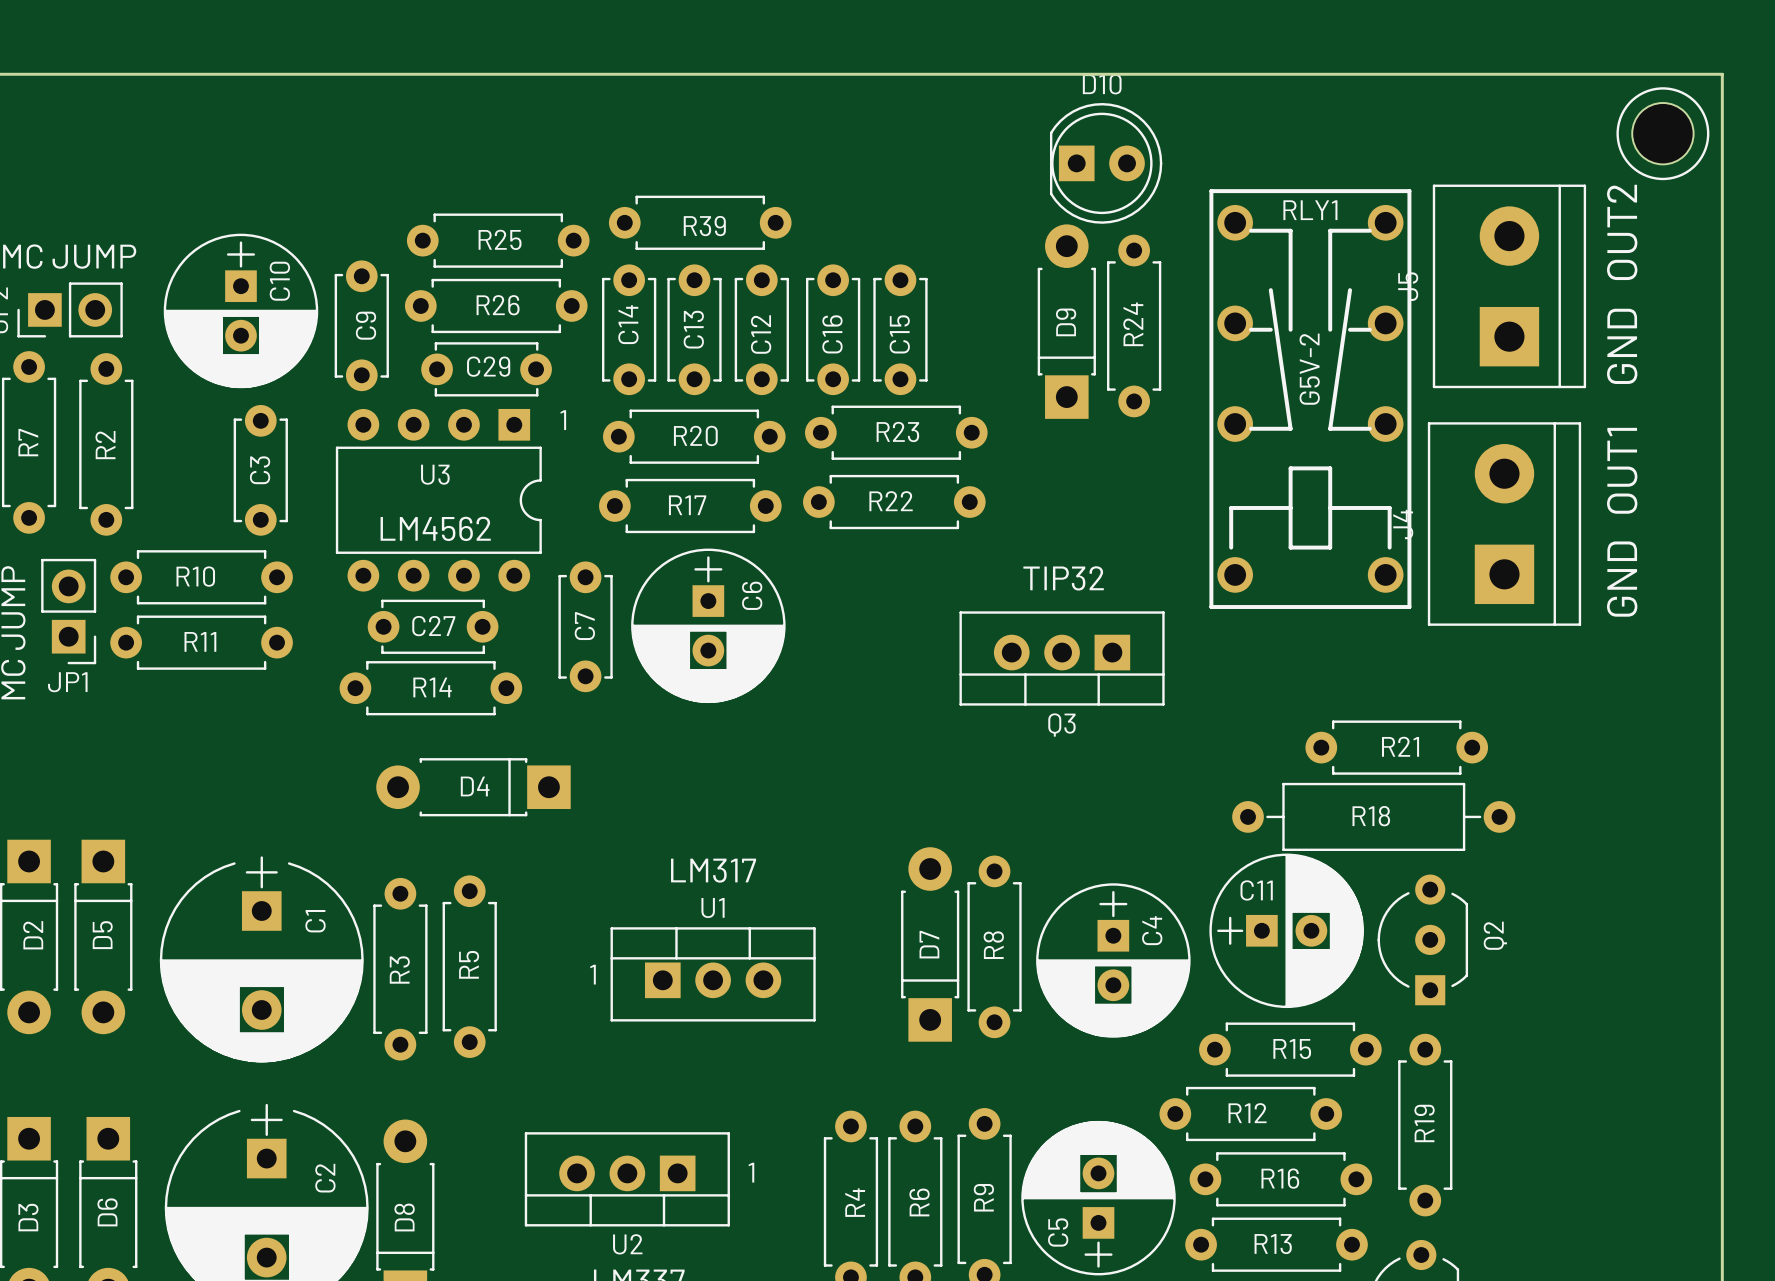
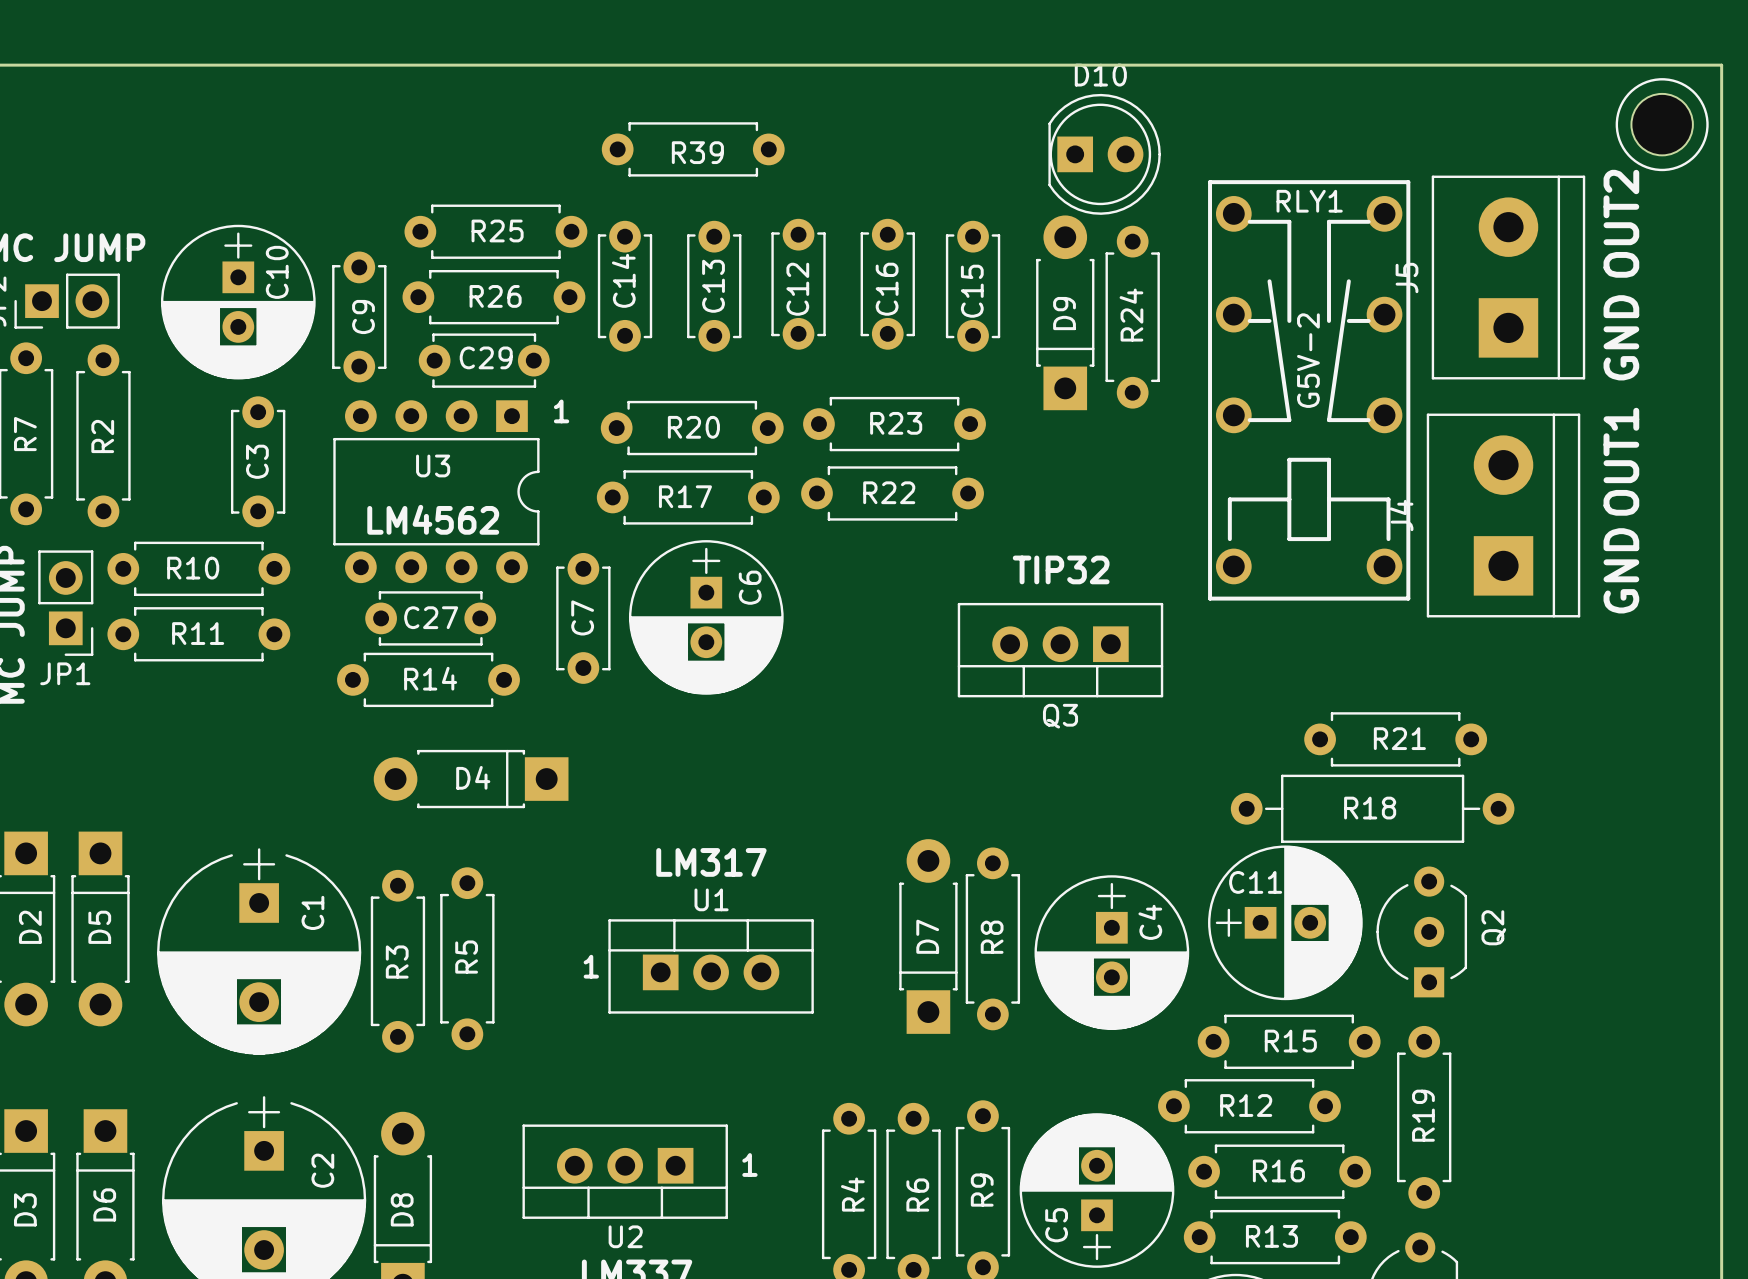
R39 position: (700, 222) -> (693, 149)
C14 position: (629, 329) -> (625, 286)
C13 position: (694, 329) -> (714, 286)
C12 position: (761, 329) -> (798, 284)
C16 position: (833, 329) -> (887, 284)
C15 position: (900, 329) -> (973, 286)

